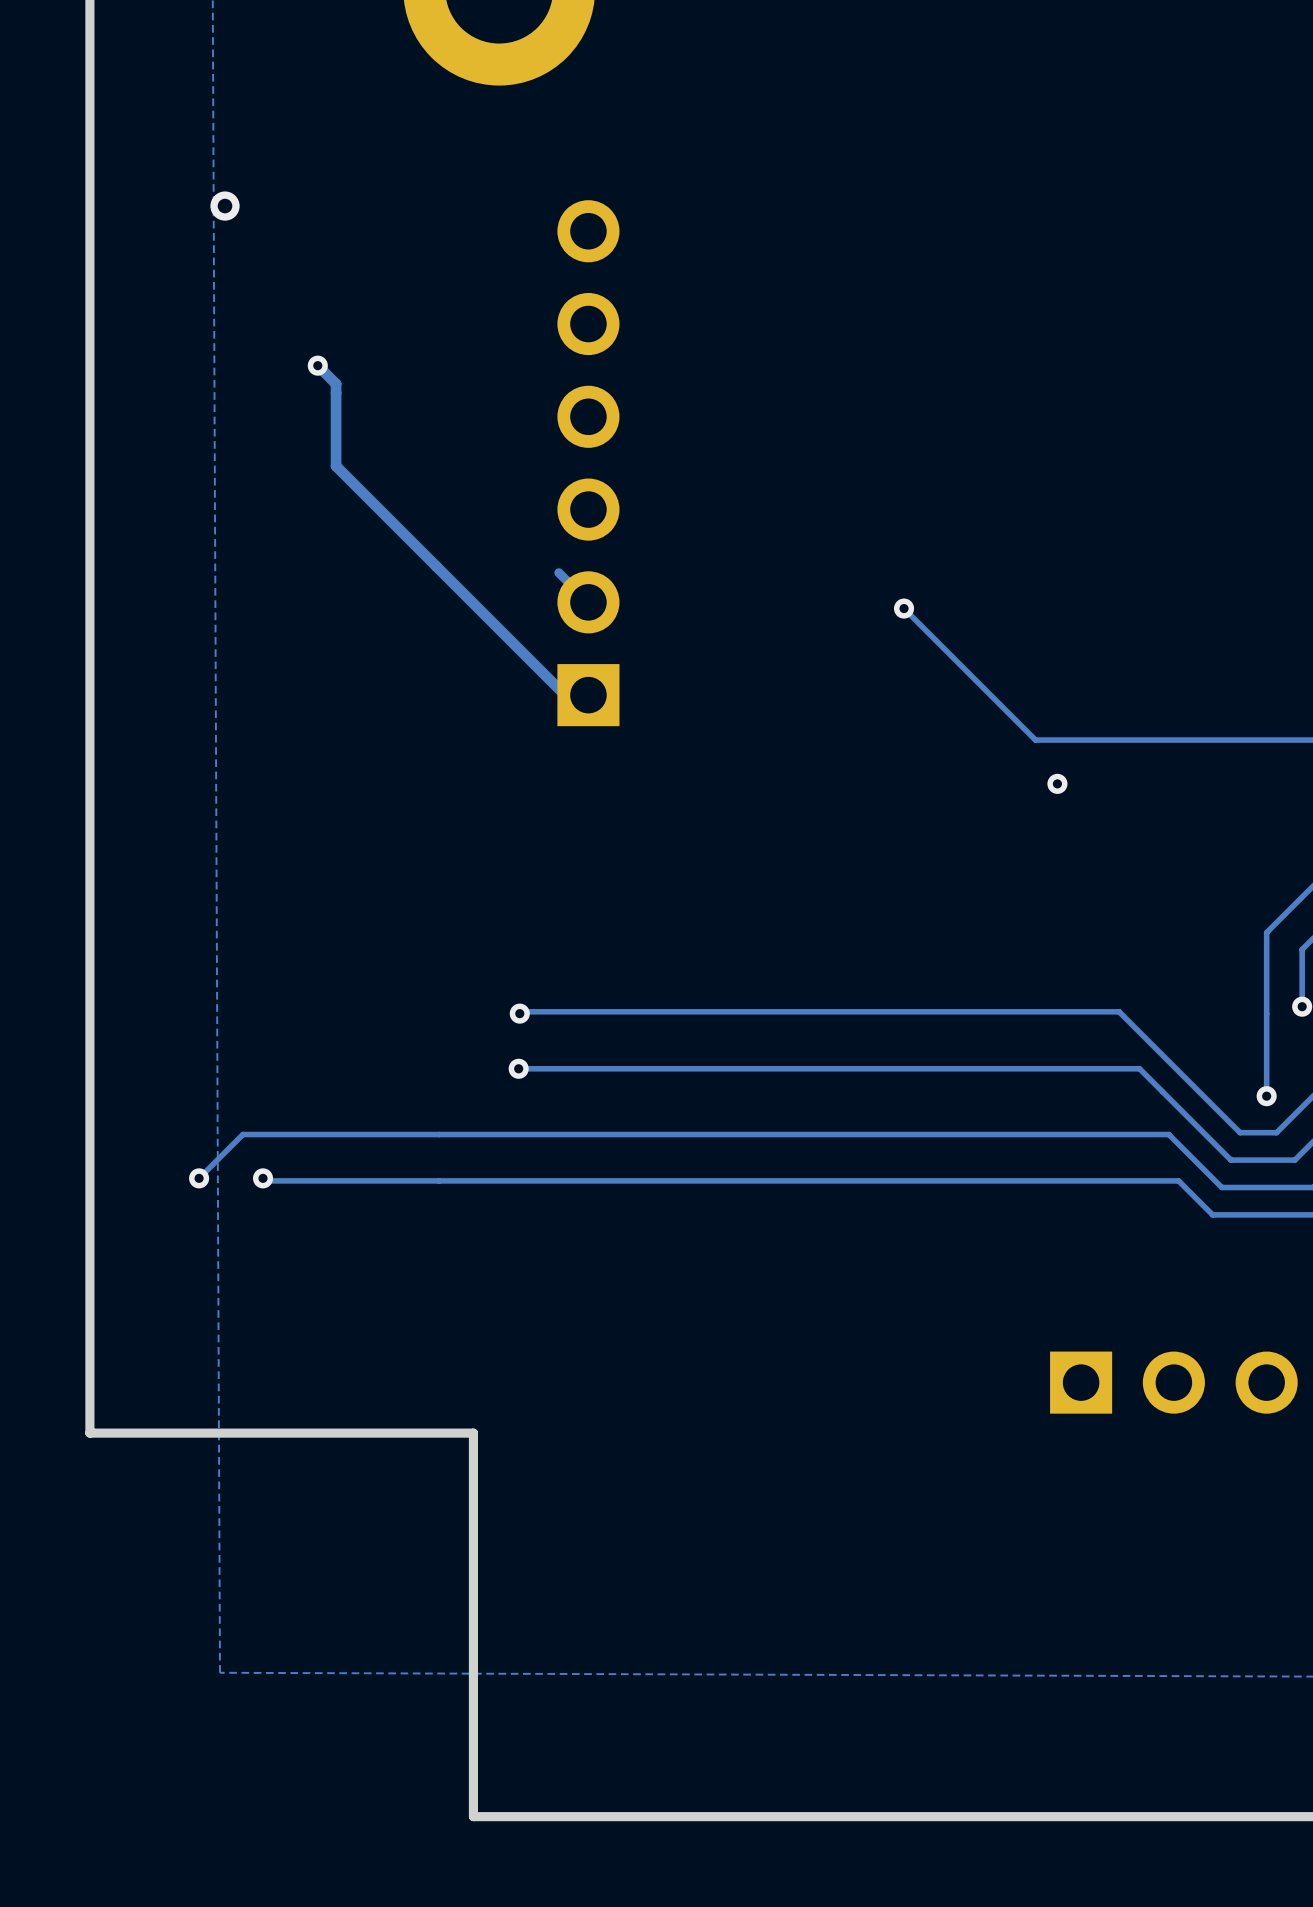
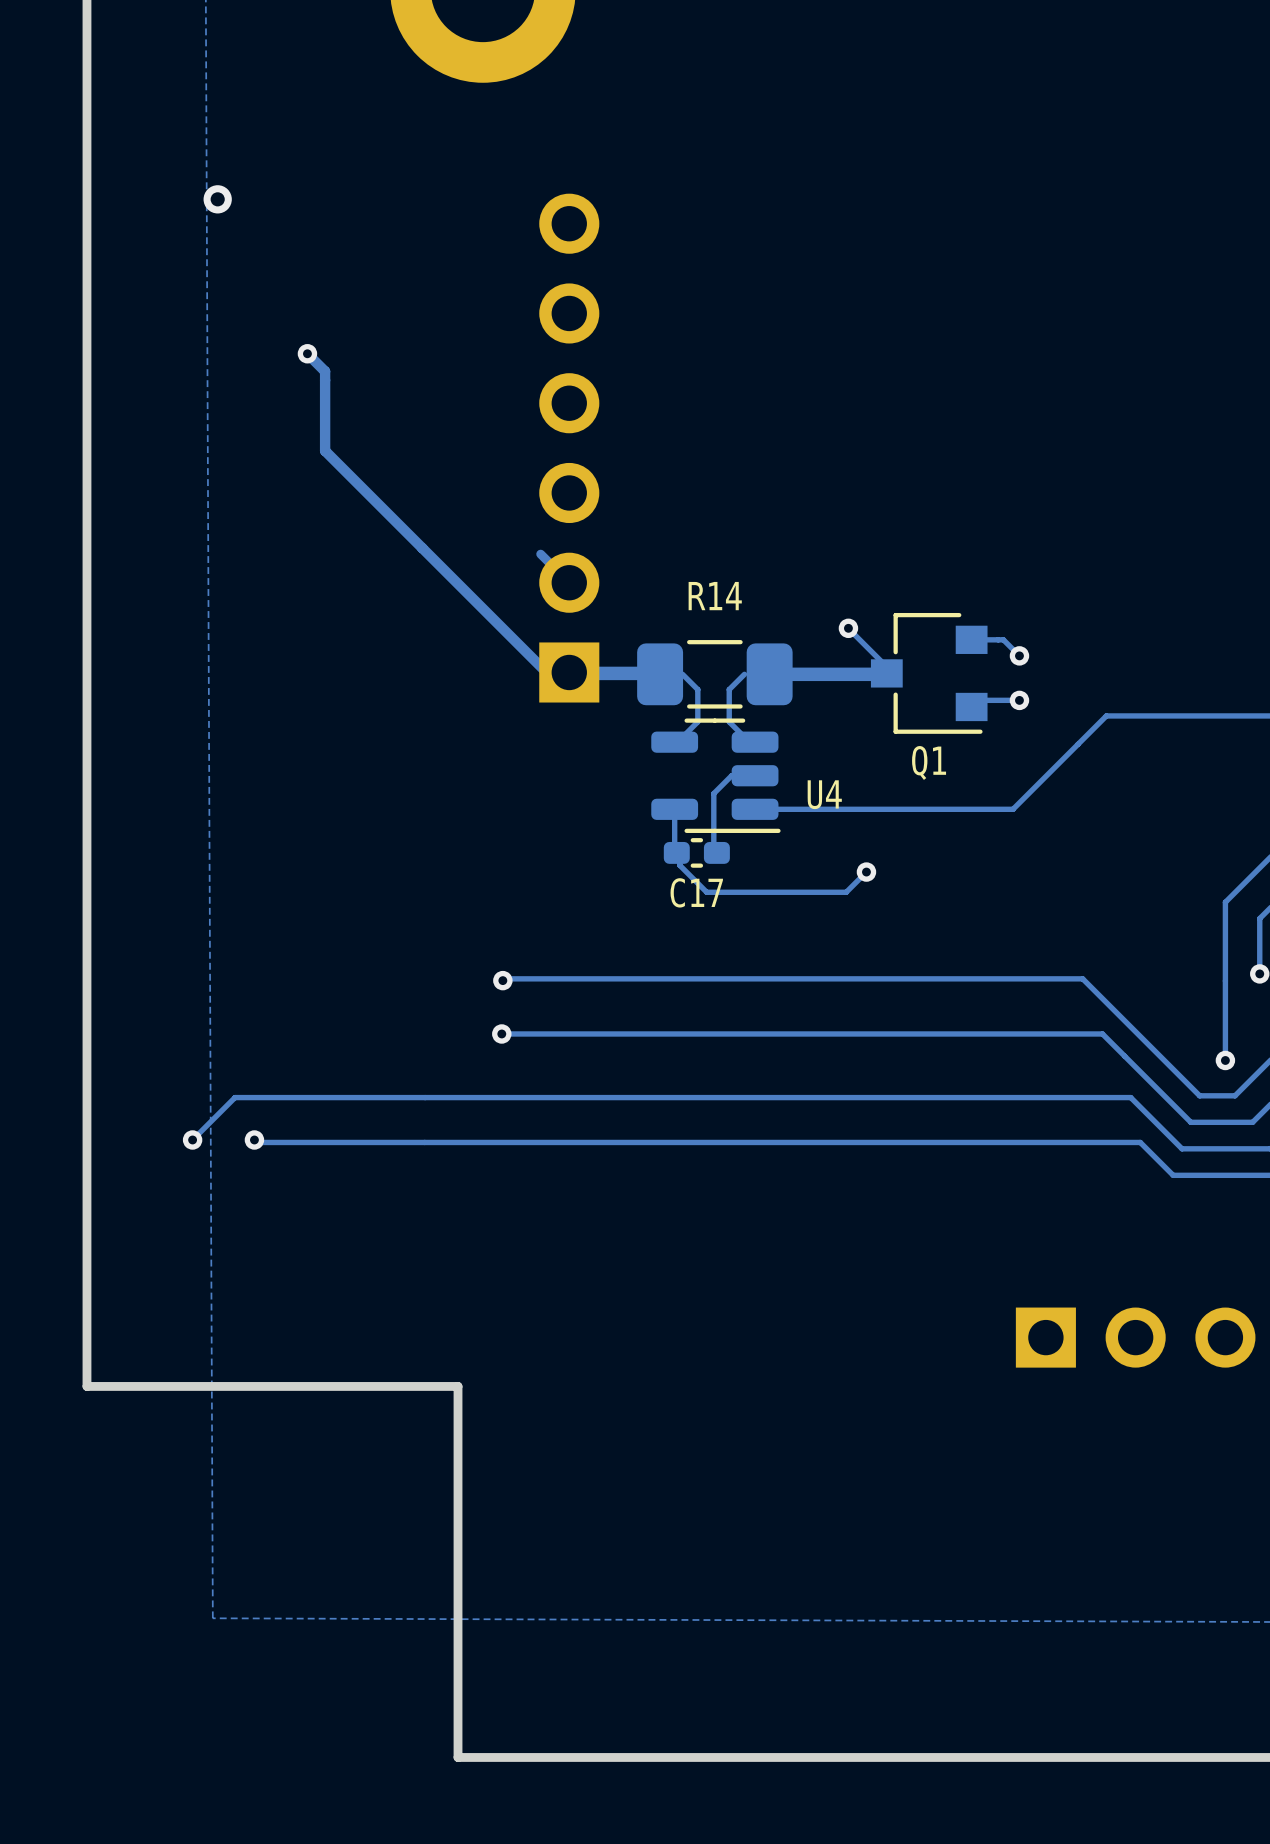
track: (904, 608) (1035, 740) (1143, 740) -> (755, 809) (1013, 809) (1106, 715)
via position: (904, 608) -> (848, 628)
track: none -> (848, 628) (886, 666) (885, 674) (769, 674)
track: none -> (971, 639) (1003, 639) (1019, 655)
via: none -> (1019, 655)
track: none -> (578, 673) (660, 674)
Q1: none -> (929, 673)
track: none -> (682, 674) (697, 689) (697, 721) (677, 742)
R14: none -> (714, 674)
track: none -> (744, 674) (729, 689) (729, 721) (749, 742)
track: none -> (1018, 700) (978, 700) (971, 706)
via: none -> (1019, 700)
via: (1057, 783) -> none
U4: none -> (715, 775)
track: none -> (755, 775) (731, 775) (713, 793) (713, 852)
track: none -> (674, 809) (674, 847)
track: none -> (679, 852) (679, 865) (706, 892) (846, 892) (866, 872)
C17: none -> (696, 852)
via: none -> (866, 872)

